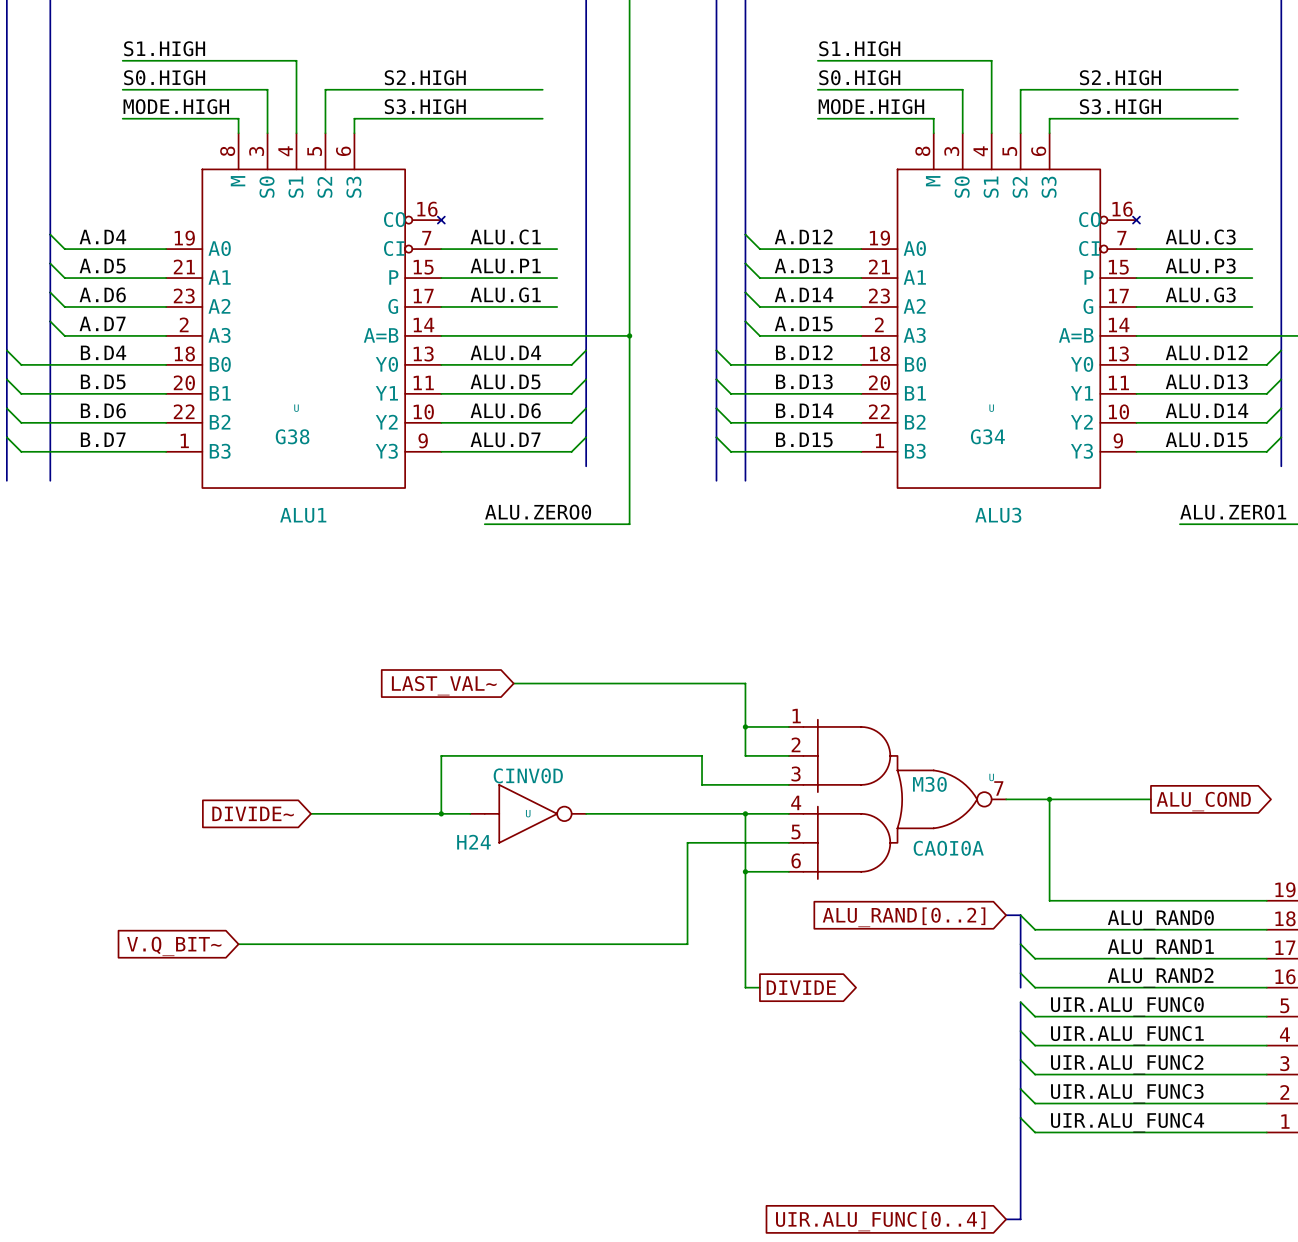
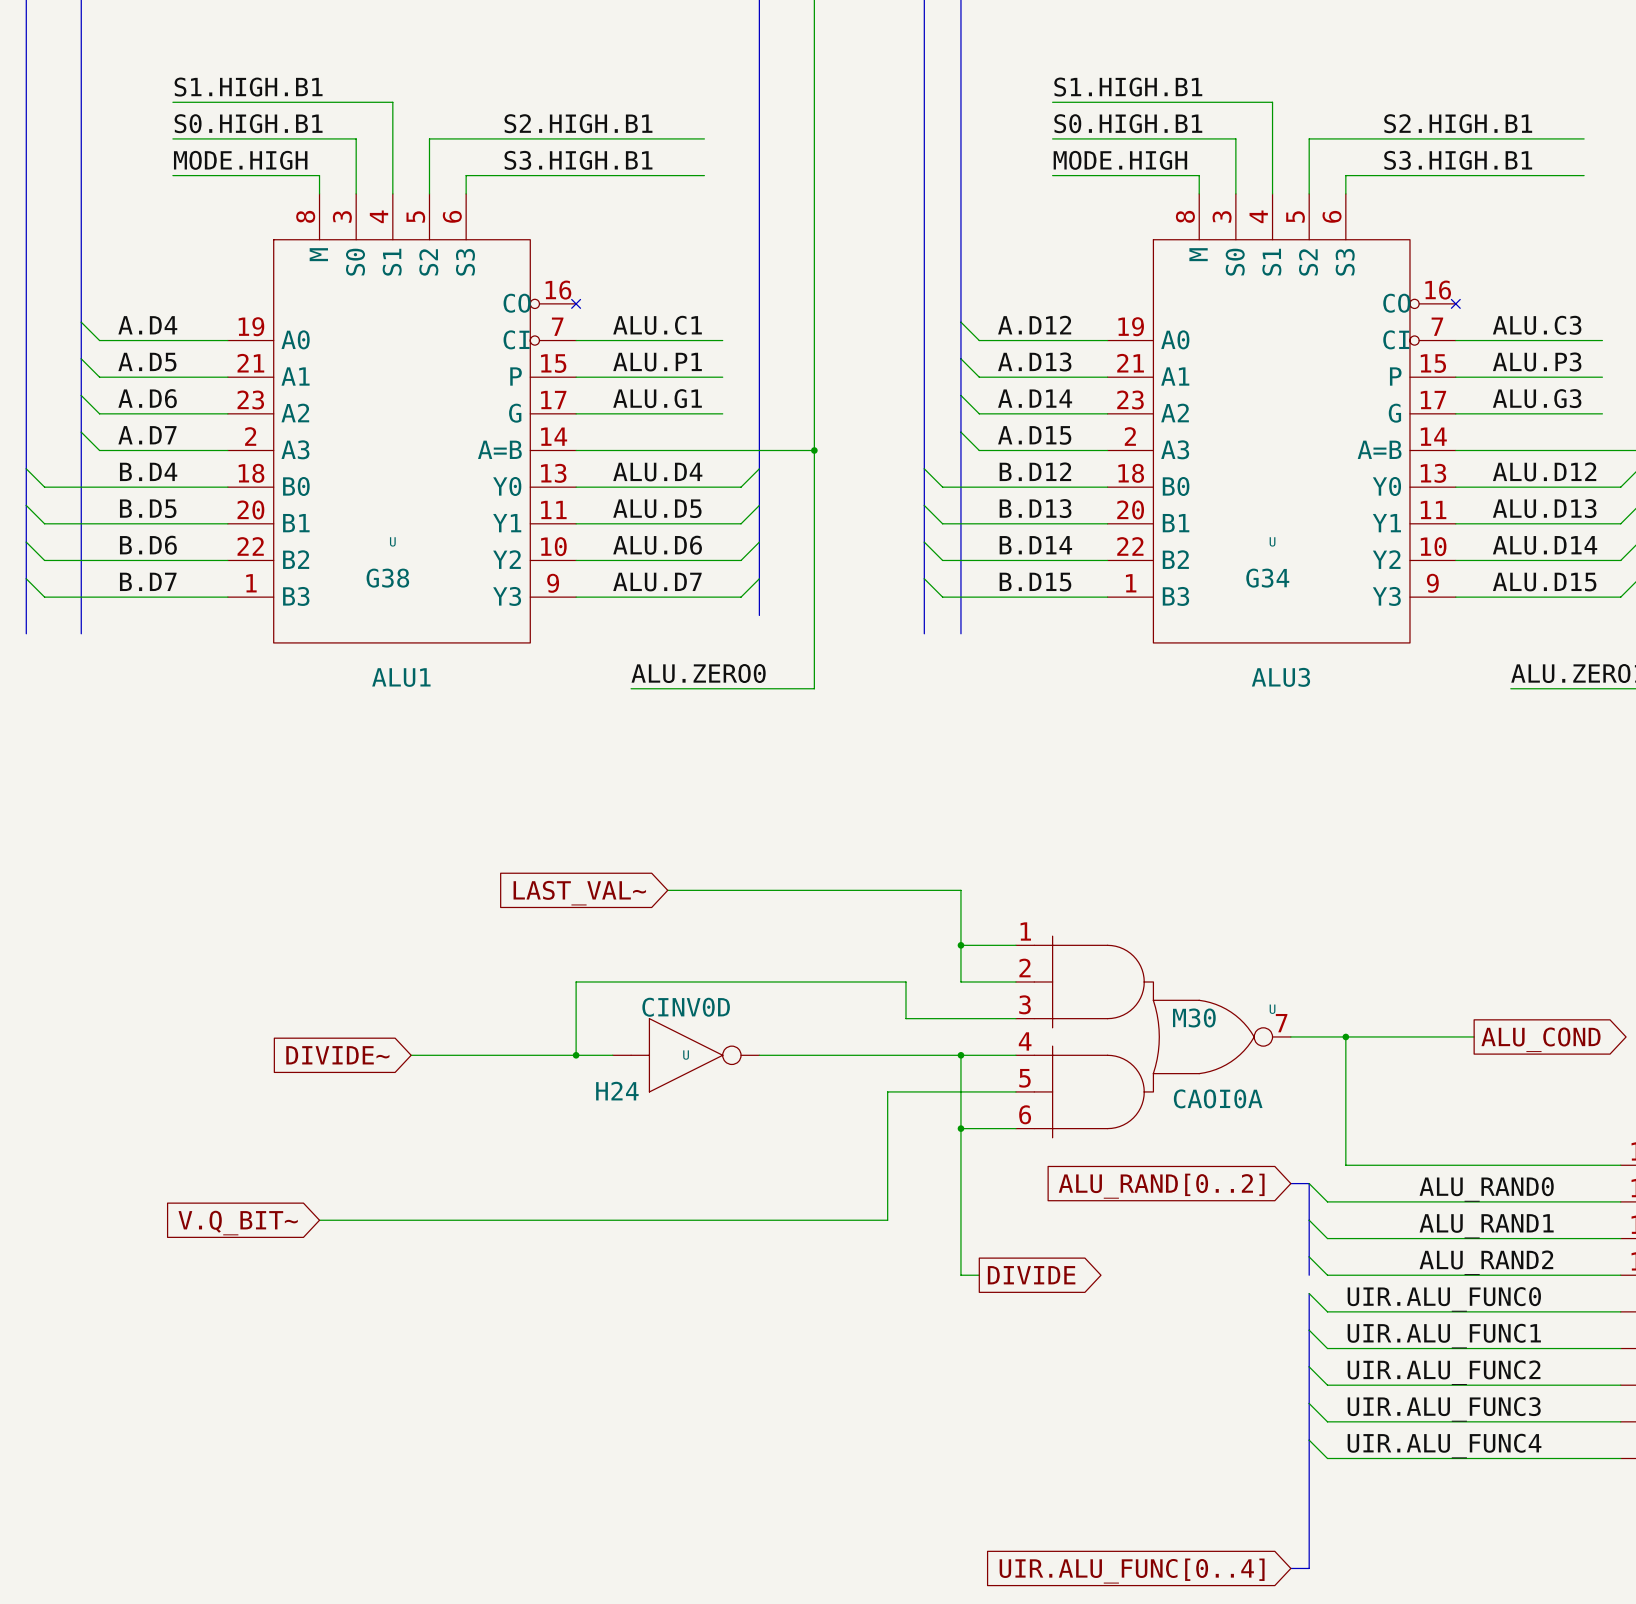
label: S1.HIGH (164, 48) -> S1.HIGH.B1 (248, 87)
label: S1.HIGH (859, 48) -> S1.HIGH.B1 (1128, 87)
label: S0.HIGH (164, 77) -> S0.HIGH.B1 (248, 123)
label: S2.HIGH (425, 77) -> S2.HIGH.B1 (578, 123)
label: S0.HIGH (859, 77) -> S0.HIGH.B1 (1128, 123)
label: S2.HIGH (1120, 77) -> S2.HIGH.B1 (1458, 123)
label: S3.HIGH (425, 106) -> S3.HIGH.B1 (578, 160)
label: S3.HIGH (1120, 106) -> S3.HIGH.B1 (1458, 160)

